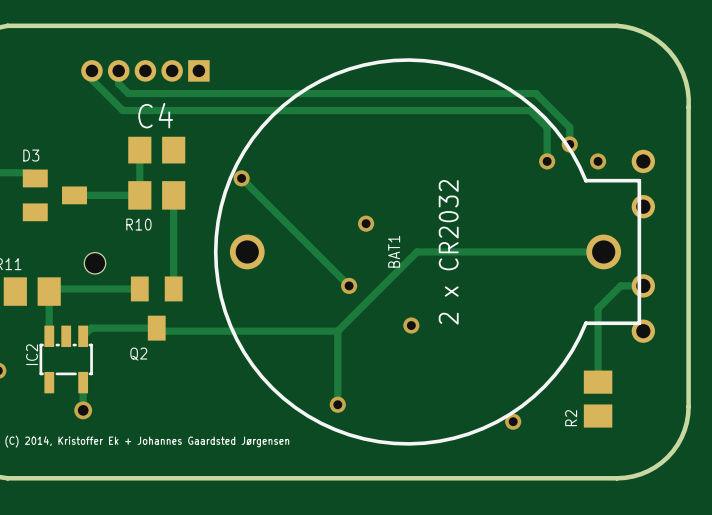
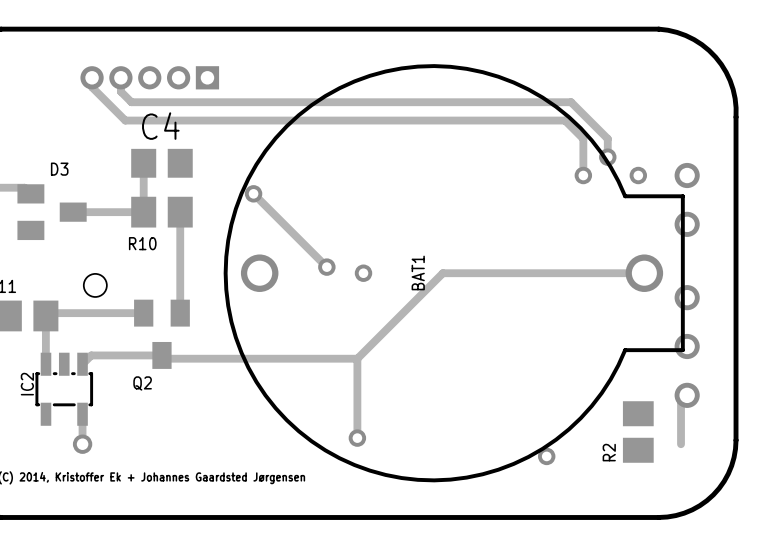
D3 name position: D3 (31, 155) -> D3 (59, 169)
via: (366, 223) -> none
track: (309, 246) (349, 285) -> none
via: none -> (326, 267)
via: none -> (363, 273)
text: 2 x CR2032 (448, 252) -> none
part footprint: [631, 274, 655, 343] -> [674, 285, 700, 408]
via: (349, 285) -> none
track: (643, 285) (620, 285) (598, 308) (598, 382) -> none
via: (411, 325) -> none
track: none -> (687, 395) (681, 401) (681, 444)

